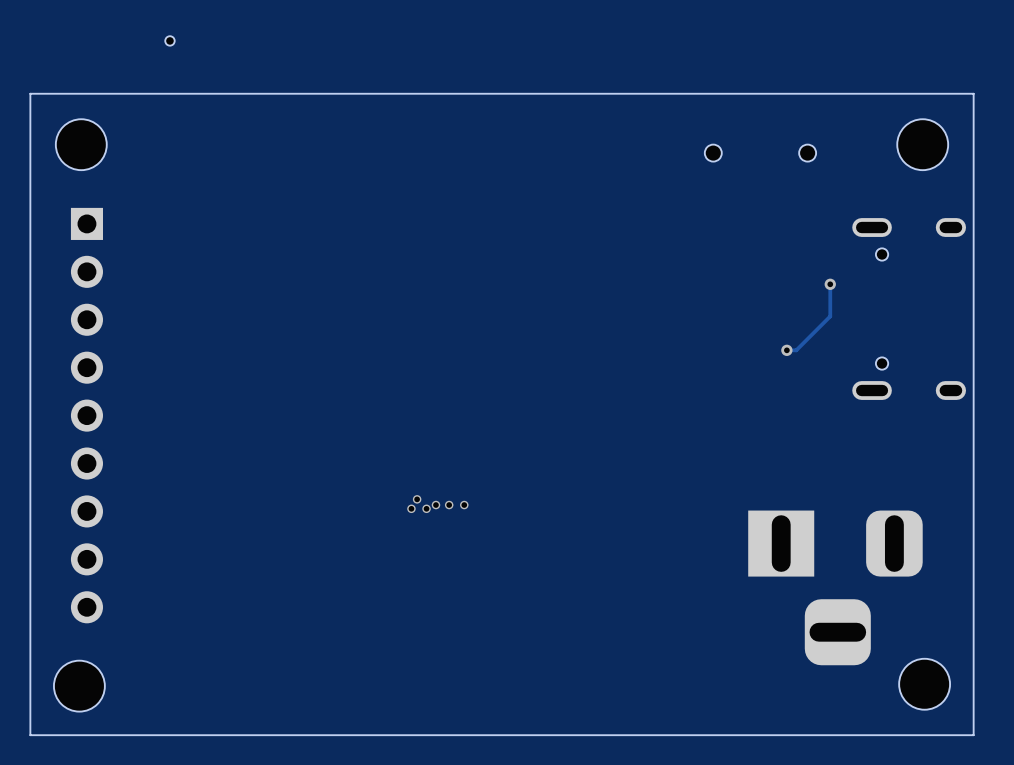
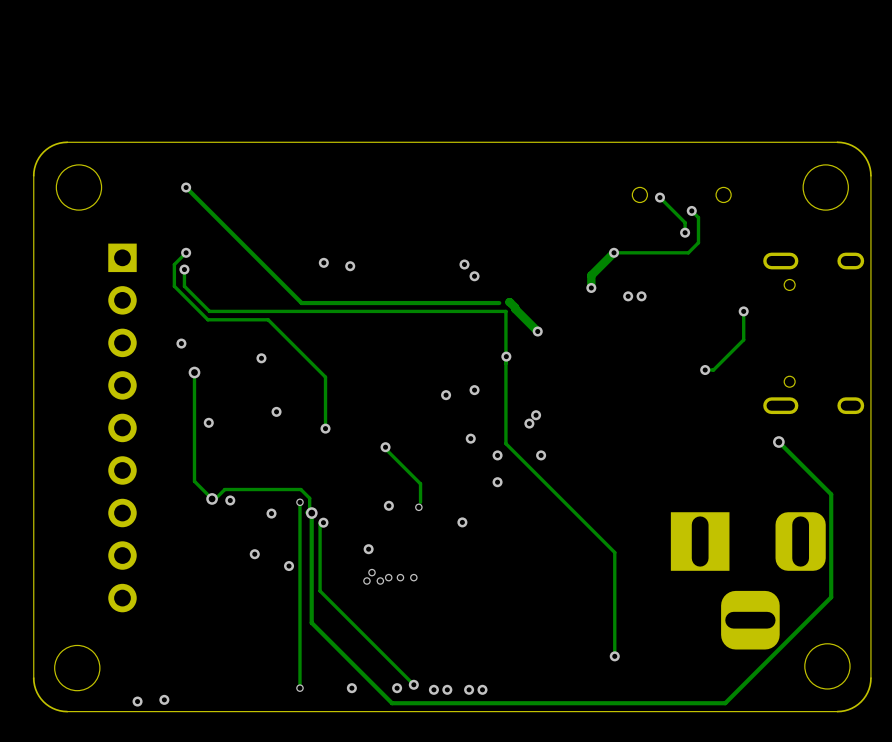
part: (169, 40) -> none
board edge: (68, 93) (30, 93) (30, 131) -> (67, 142) (52, 145) (43, 152) (37, 161) (33, 175)
board edge: (935, 93) (973, 93) (973, 131) -> (837, 142) (848, 144) (861, 152) (867, 161) (870, 175)
track: none -> (186, 187) (301, 303) (499, 303)
via: none -> (186, 187)
track: none -> (659, 197) (685, 222) (685, 232)
via: none -> (659, 197)
track: none -> (691, 210) (698, 217) (698, 242) (688, 252) (614, 252) (591, 275) (591, 287)
via: none -> (691, 210)
via: none -> (685, 232)
track: none -> (186, 252) (174, 264) (174, 286) (207, 319) (268, 319) (325, 377) (325, 428)
via: none -> (186, 252)
via: none -> (614, 252)
via: none -> (323, 262)
via: none -> (464, 264)
via: none -> (350, 266)
track: none -> (184, 269) (184, 286) (209, 311) (505, 311) (505, 443) (614, 552) (614, 656)
via: none -> (184, 269)
via: none -> (474, 276)
via: none -> (591, 287)
via: none -> (628, 296)
via: none -> (641, 296)
track: none -> (509, 302) (537, 331)
via: none -> (537, 331)
via: none -> (181, 343)
via: none -> (506, 356)
via: none -> (261, 358)
track: none -> (194, 372) (194, 481) (213, 500) (224, 489) (300, 489) (309, 498) (309, 509) (306, 512)
via: none -> (194, 372)
via: none -> (474, 390)
via: none -> (446, 395)
via: none -> (276, 411)
via: none -> (536, 415)
via: none -> (208, 422)
via: none -> (529, 423)
part position: (86, 415) -> (122, 427)
via: none -> (325, 428)
via: none -> (470, 438)
track: none -> (778, 442) (831, 494) (831, 597) (725, 703) (392, 703) (311, 622) (311, 513)
via: none -> (778, 442)
track: none -> (385, 447) (420, 483) (420, 502)
via: none -> (385, 447)
via: none -> (497, 455)
via: none -> (541, 455)
via: none -> (497, 482)
via: none -> (212, 498)
via: none -> (230, 500)
track: none -> (299, 502) (299, 688)
via: none -> (299, 502)
via: (417, 499) -> none
via: none -> (388, 505)
via: (435, 505) -> none
via: (449, 505) -> none
via: (411, 508) -> none
via: (426, 508) -> none
via: none -> (311, 513)
via: none -> (271, 513)
track: none -> (323, 522) (320, 523) (320, 591) (413, 684)
via: none -> (323, 522)
via: none -> (462, 522)
via: none -> (368, 549)
via: none -> (254, 554)
via: none -> (289, 566)
via: none -> (371, 572)
via: none -> (388, 577)
via: none -> (400, 577)
via: none -> (413, 577)
via: none -> (366, 580)
via: none -> (380, 580)
via: none -> (614, 656)
board edge: (30, 697) (30, 735) (68, 735) -> (33, 678) (35, 689) (43, 701) (56, 709) (67, 711)
board edge: (973, 697) (973, 735) (935, 735) -> (870, 678) (869, 689) (861, 701) (852, 708) (837, 711)
via: none -> (413, 684)
via: none -> (299, 688)
via: none -> (351, 688)
via: none -> (397, 688)
via: none -> (433, 689)
via: none -> (447, 689)
via: none -> (469, 689)
via: none -> (482, 689)
via: none -> (164, 699)
via: none -> (137, 701)

